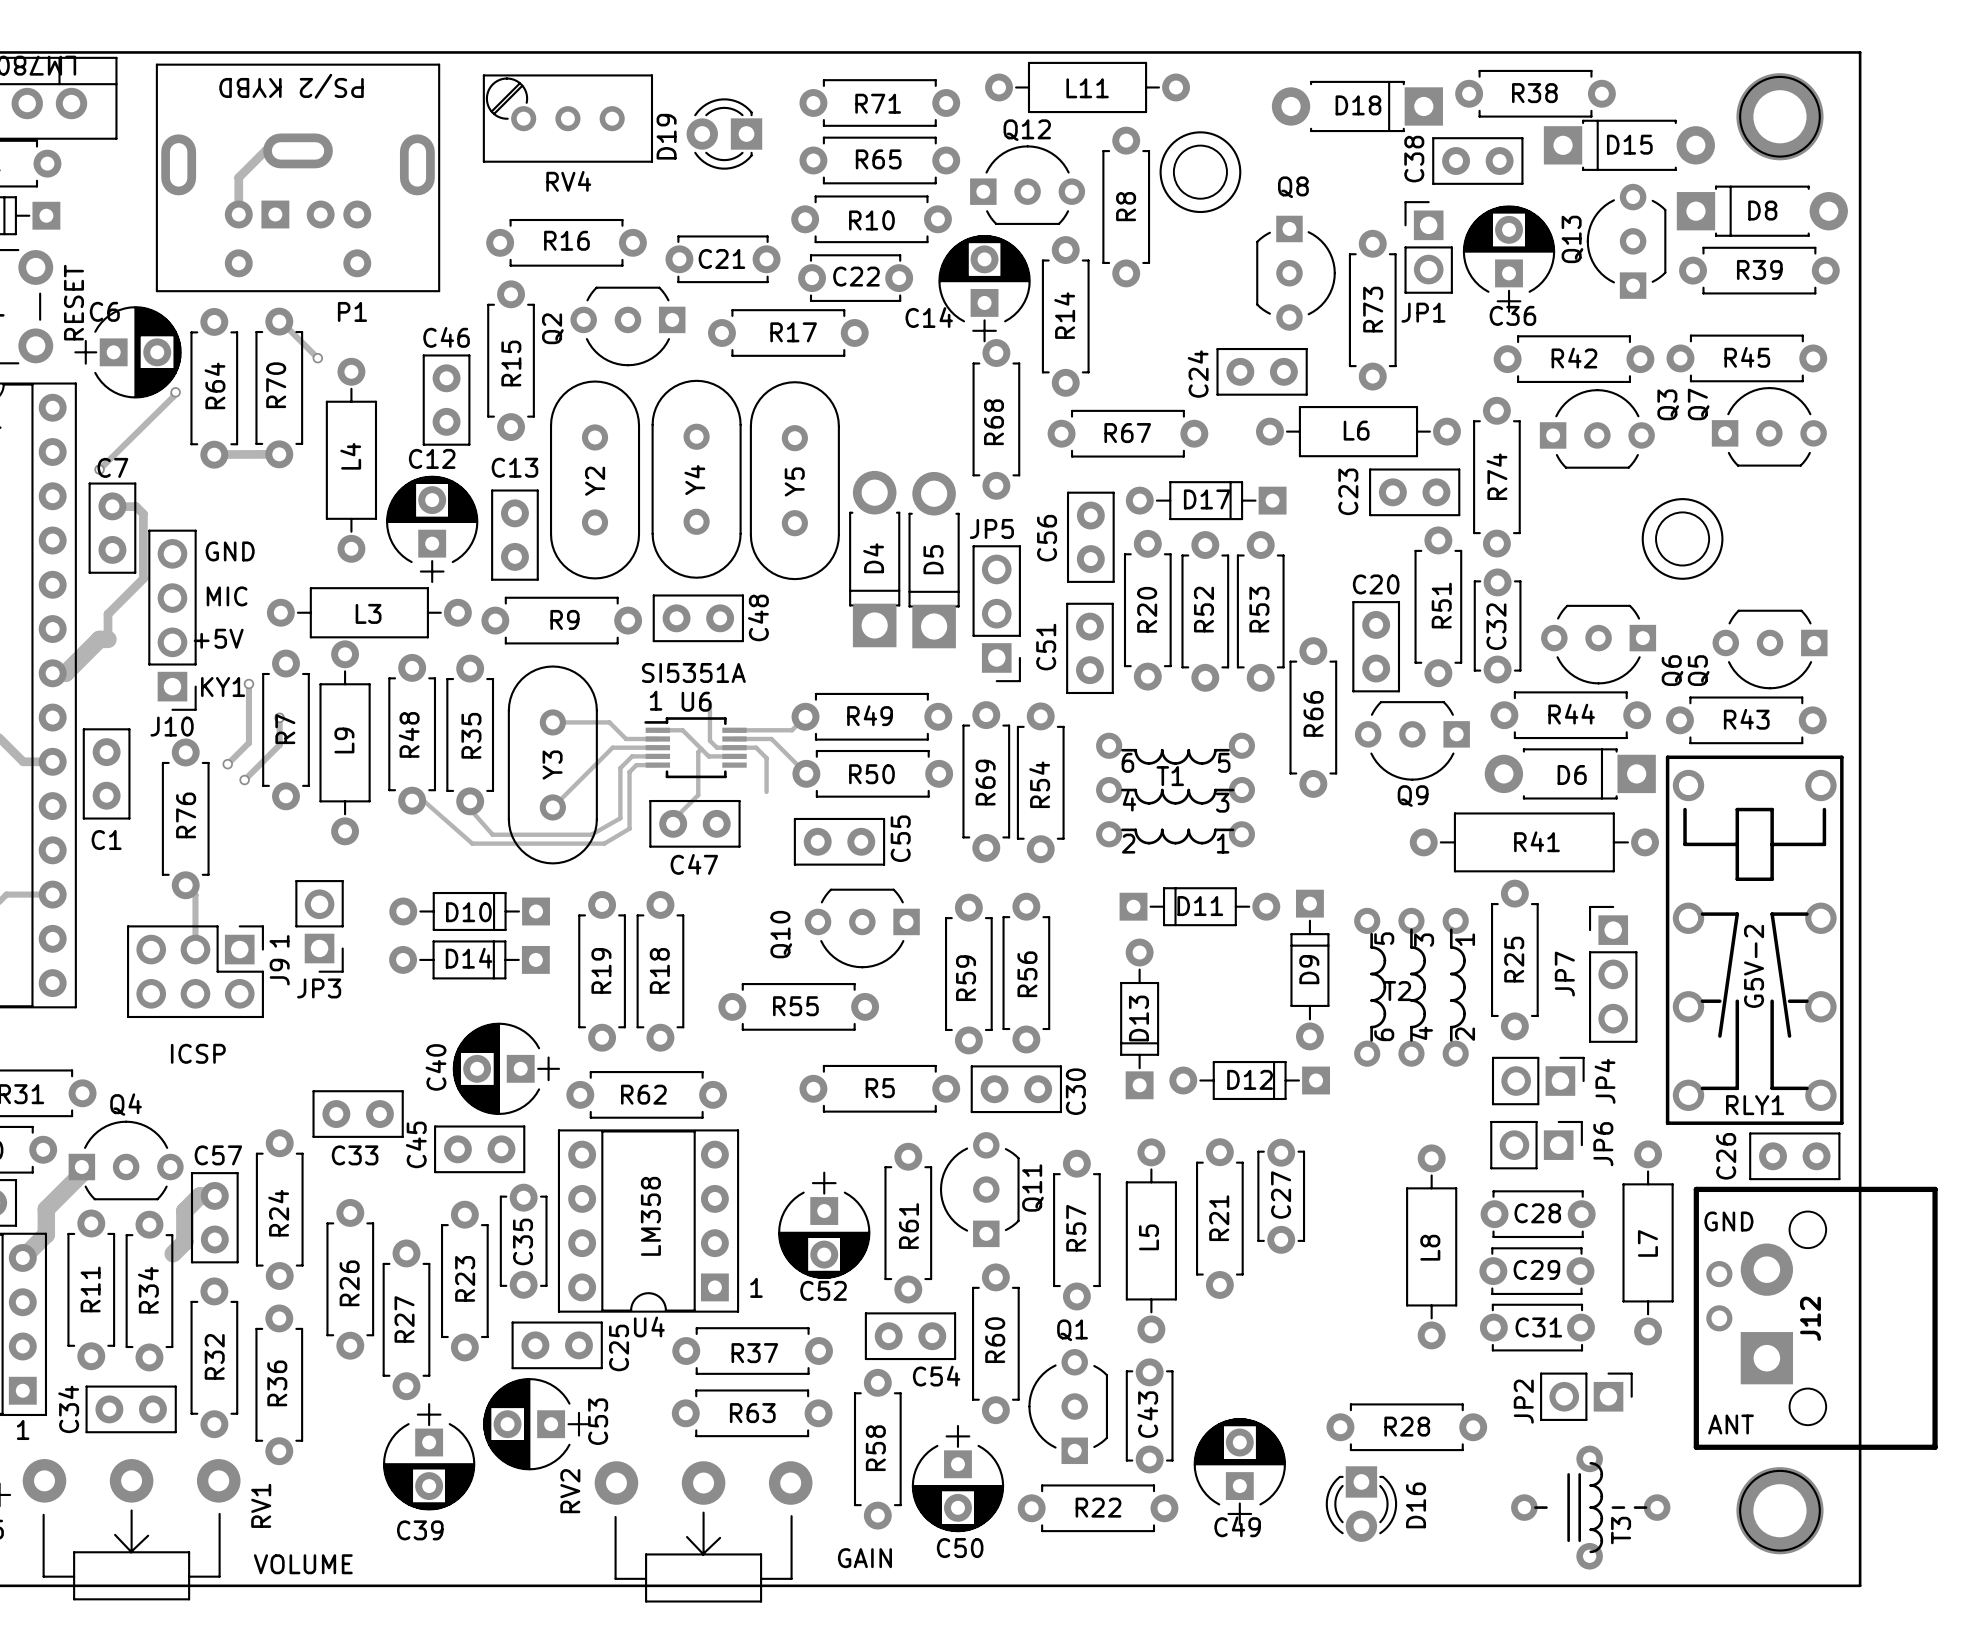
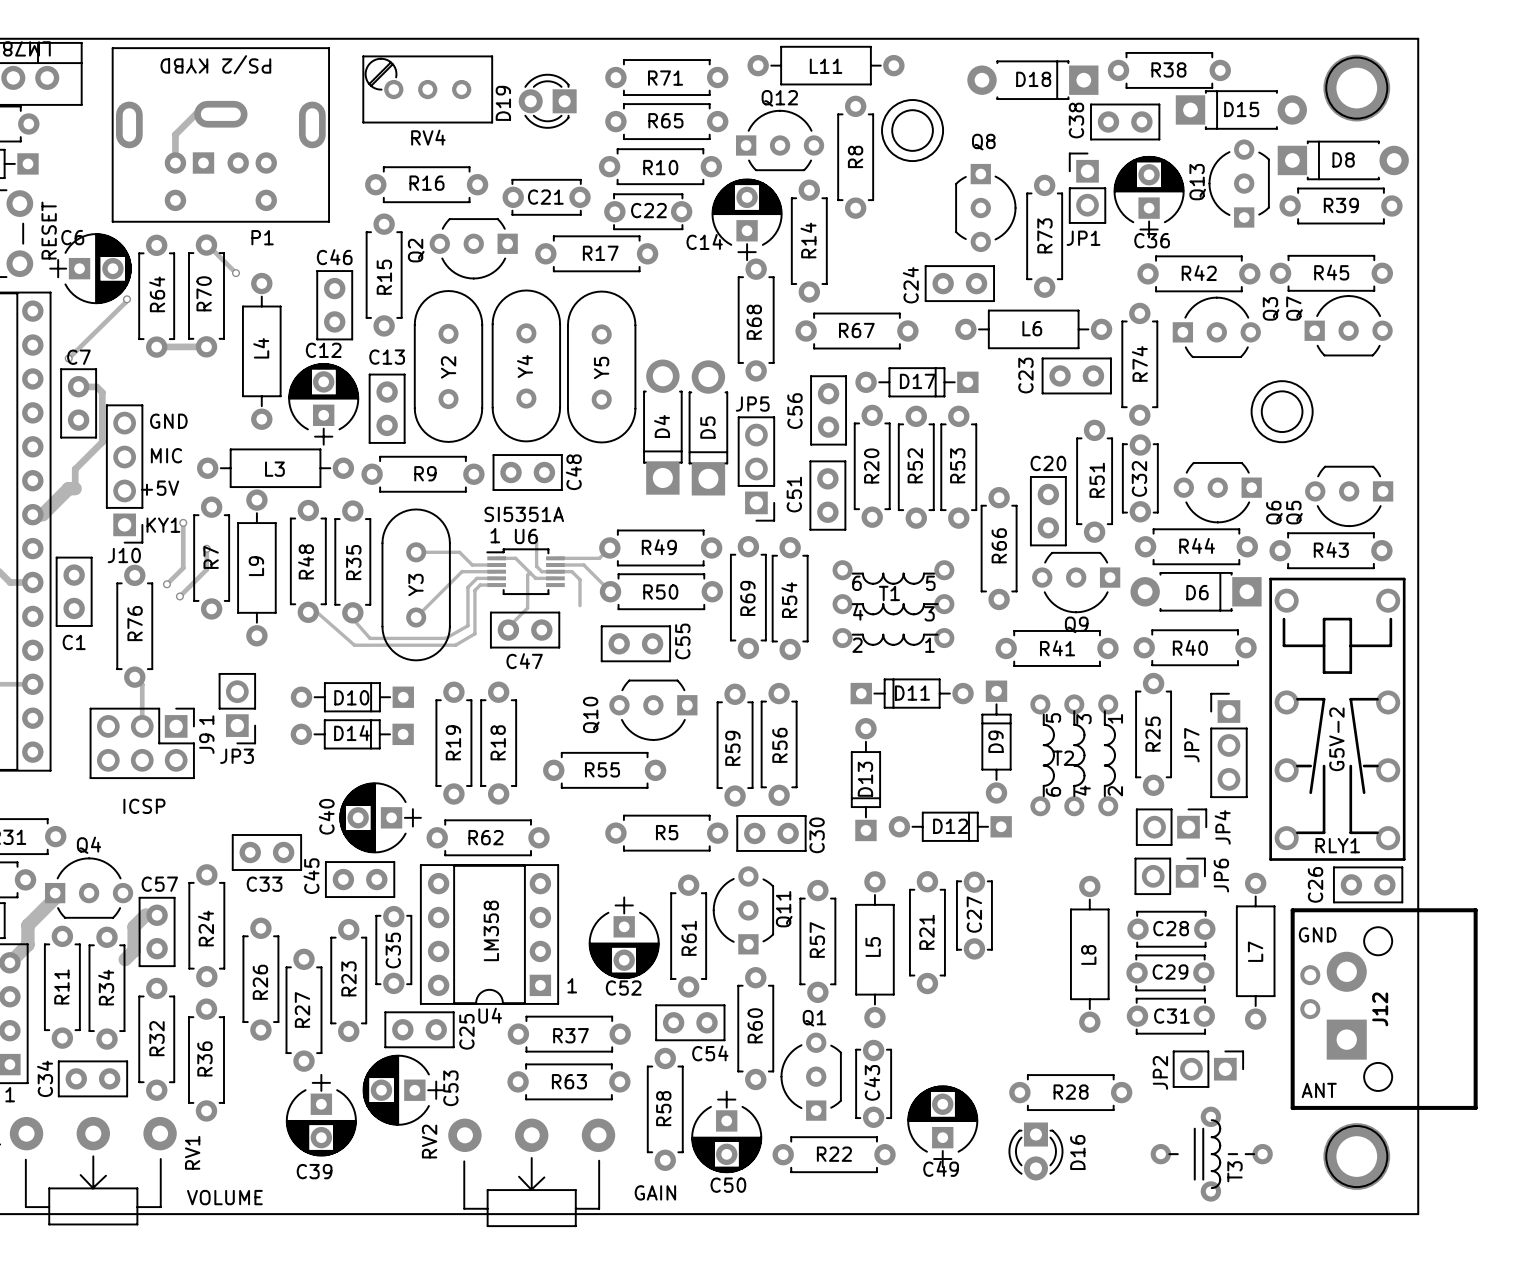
R51 position: (1438, 606) -> (1094, 481)
C20 position: (1376, 646) -> (1048, 511)
Q9 position: (1412, 740) -> (1076, 582)
R41 footprint: [1409, 812, 1659, 873] -> [995, 630, 1119, 667]
R40: none -> (1195, 647)

